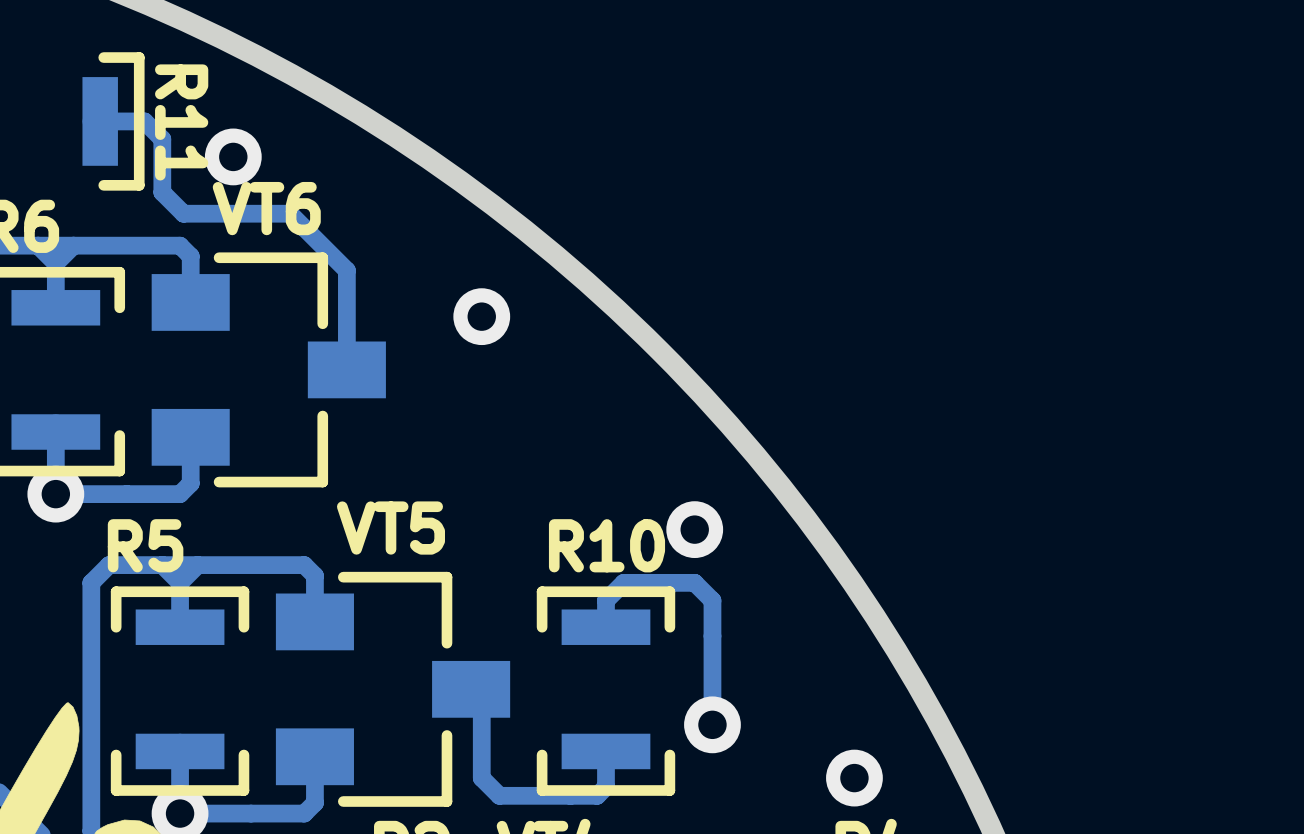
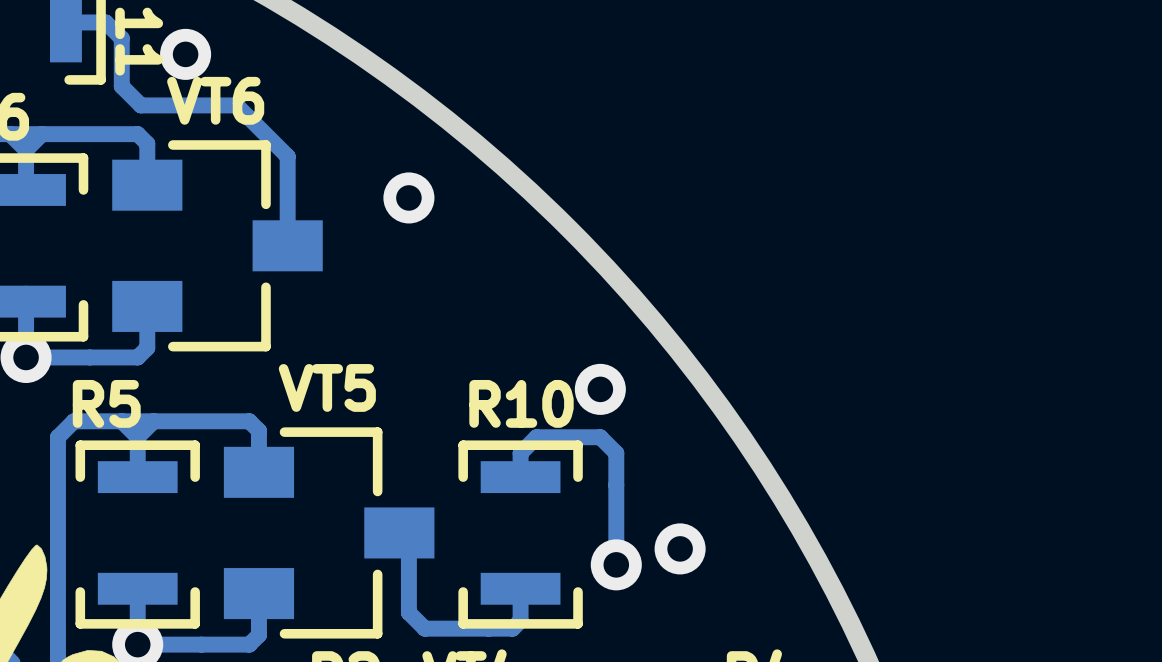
via position: (854, 778) -> (680, 548)

